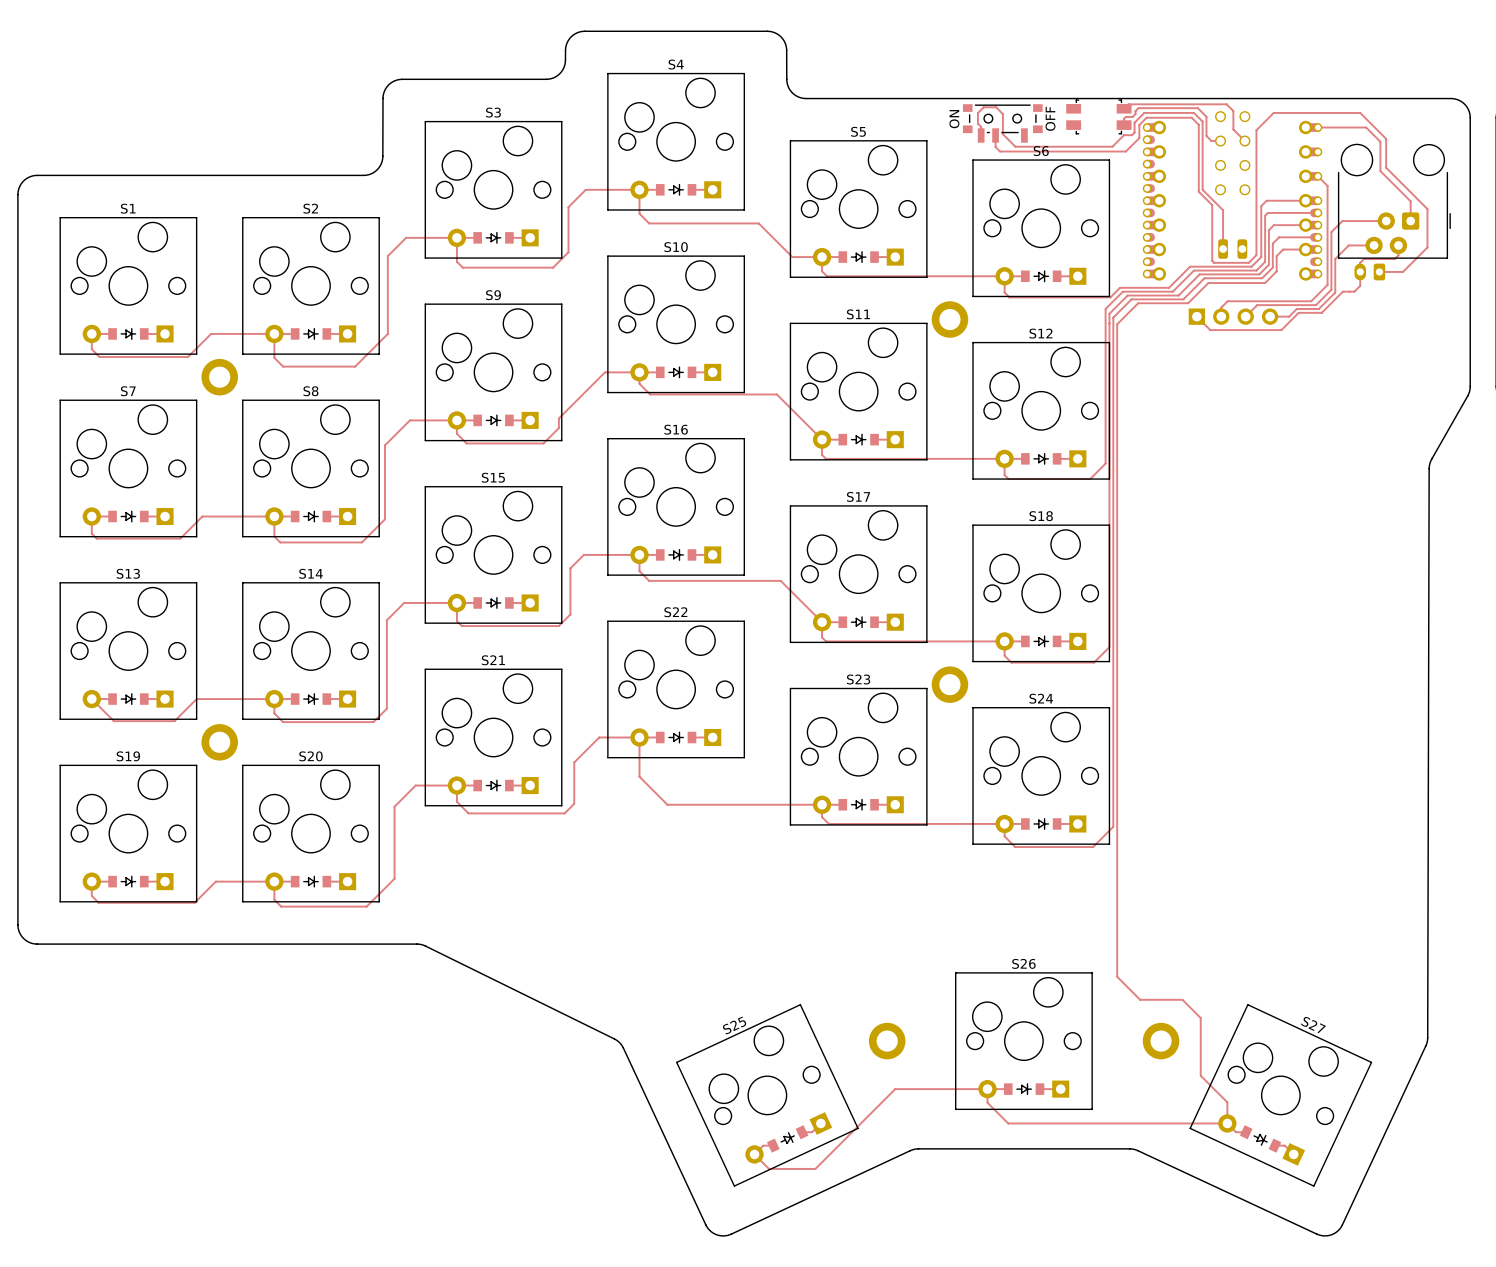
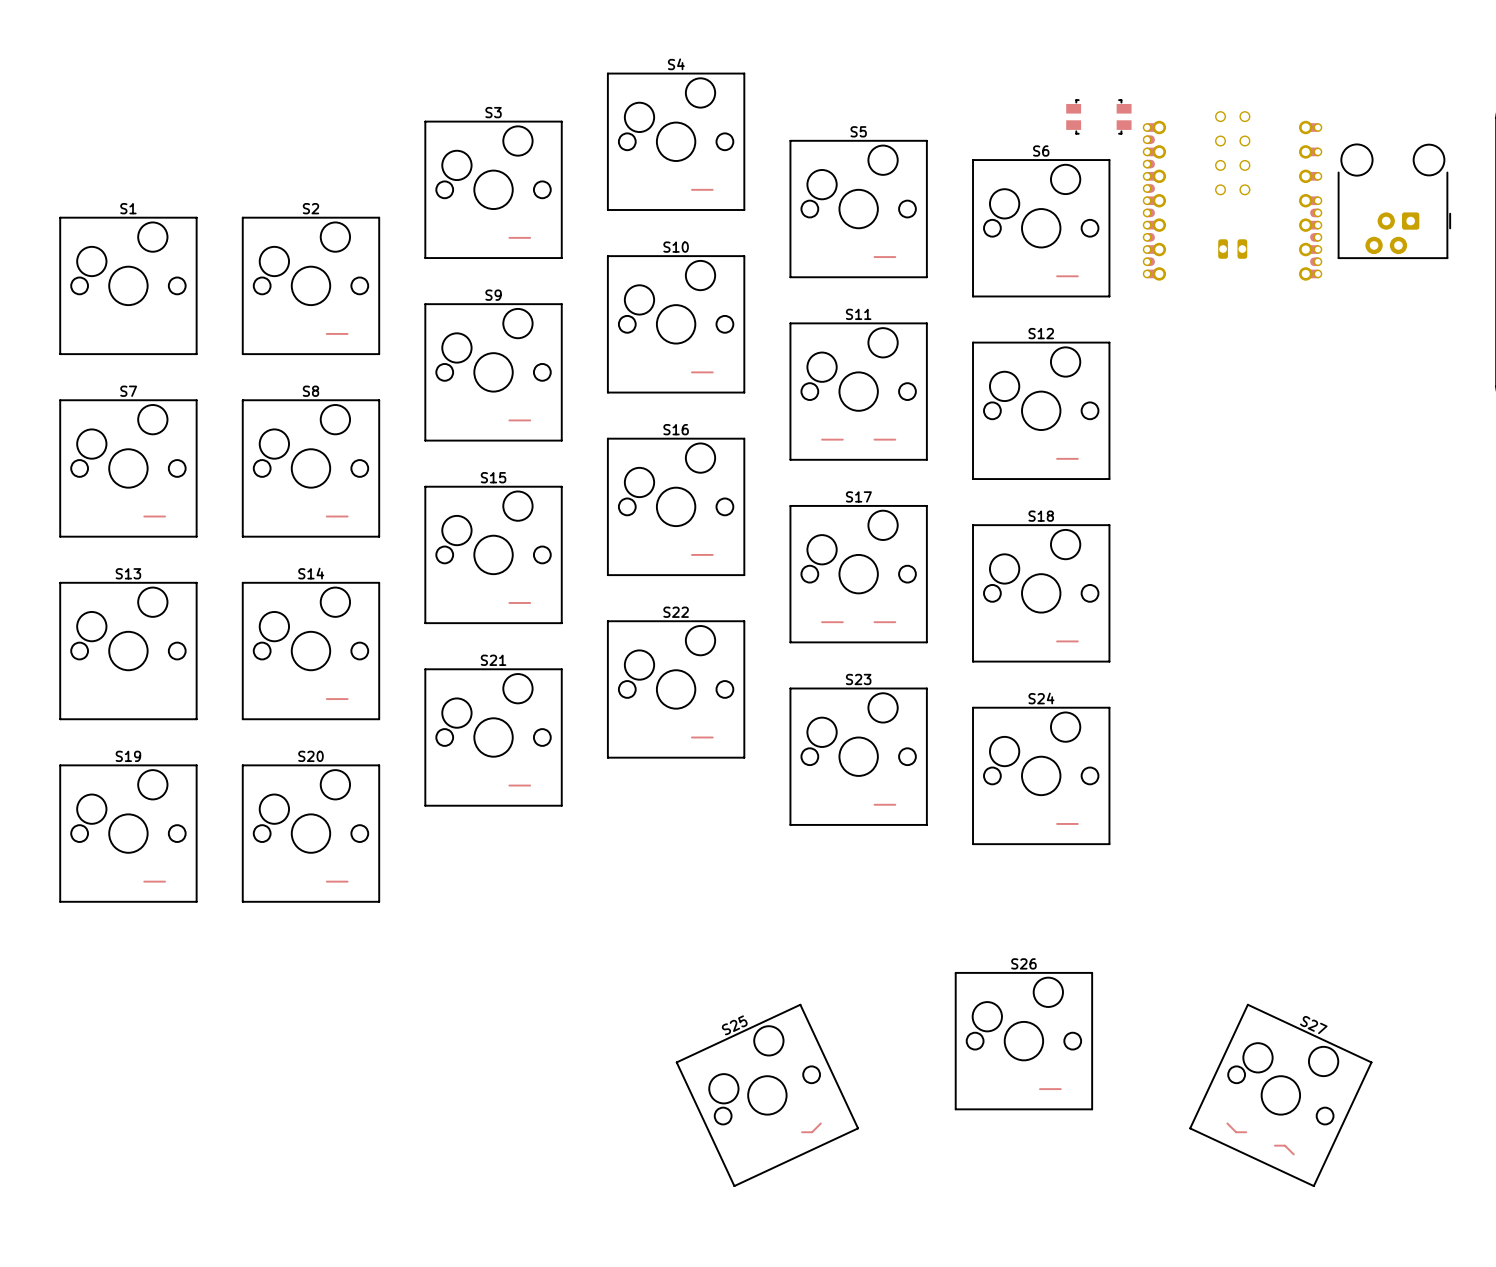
board edge: (584, 31) (772, 31) (781, 36) (786, 45) (788, 86) (794, 94) (803, 98) (1451, 98) (1459, 100) (1467, 107) (1470, 117) (1470, 388) (1431, 459) (1429, 468) (1427, 1039) (1342, 1224) (1336, 1232) (1326, 1235) (1316, 1234) (1133, 1149) (918, 1148) (910, 1150) (731, 1234) (718, 1235) (711, 1231) (705, 1224) (619, 1042) (425, 946) (417, 944) (37, 944) (26, 941) (20, 935) (17, 924) (17, 194) (20, 184) (28, 177) (37, 175) (368, 174) (377, 169) (382, 161) (383, 95) (386, 86) (392, 81) (402, 79) (551, 78) (559, 73) (563, 67) (565, 47) (569, 38) (575, 33) (584, 31) -> none
track: (1124, 108) (1128, 104) (1226, 104) (1233, 111) (1233, 129) (1244, 141) -> none
part: (1002, 123) -> none
track: (1124, 125) (1124, 118) (1132, 116) (1138, 108) (1197, 108) (1206, 116) (1206, 136) (1211, 141) (1220, 141) -> none
track: (1305, 127) (1366, 127) (1380, 141) (1380, 171) (1410, 201) (1410, 221) -> none
track: (981, 135) (981, 126) (977, 123) (977, 113) (983, 107) (996, 107) (1002, 114) (1002, 134) (1015, 146) (1112, 146) (1123, 135) (1132, 135) (1134, 132) (1134, 122) (1144, 112) (1194, 112) (1202, 121) (1202, 189) (1223, 210) (1223, 249) -> none
track: (995, 135) (995, 147) (1000, 151) (1125, 151) (1139, 138) (1139, 125) (1146, 117) (1191, 117) (1198, 124) (1198, 191) (1212, 205) (1212, 260) (1214, 262) (1248, 262) (1256, 255) (1256, 130) (1273, 112) (1360, 112) (1386, 138) (1386, 167) (1427, 209) (1427, 247) (1402, 271) (1379, 271) -> none
track: (1305, 176) (1317, 176) (1327, 185) (1327, 284) (1311, 301) (1227, 301) (1221, 307) (1221, 316) -> none
track: (639, 189) (639, 213) (649, 223) (758, 223) (792, 257) (842, 257) -> none
track: (660, 189) (585, 189) (568, 207) (568, 252) (553, 267) (462, 267) (456, 261) (456, 237) -> none
part: (675, 189) -> none
track: (1317, 200) (1266, 200) (1261, 206) (1261, 257) (1251, 266) (1190, 266) (1169, 287) (1120, 287) (1110, 297) (1009, 297) (1004, 292) (1004, 276) -> none
track: (1317, 212) (1267, 212) (1265, 215) (1265, 261) (1256, 270) (1193, 270) (1172, 291) (1122, 291) (1105, 308) (1105, 463) (1090, 479) (1008, 479) (1004, 475) (1004, 458) -> none
track: (1386, 221) (1342, 221) (1331, 232) (1331, 289) (1316, 305) (1257, 305) (1245, 316) -> none
track: (1317, 225) (1274, 225) (1268, 230) (1268, 264) (1259, 274) (1199, 274) (1178, 295) (1127, 295) (1109, 313) (1109, 647) (1094, 662) (1011, 662) (1004, 655) (1004, 641) -> none
track: (477, 237) (406, 237) (387, 256) (387, 333) (355, 366) (283, 366) (274, 357) (274, 333) -> none
part: (493, 237) -> none
track: (1317, 237) (1279, 237) (1272, 243) (1272, 267) (1262, 278) (1204, 278) (1183, 299) (1131, 299) (1113, 317) -> none
track: (1374, 245) (1348, 245) (1335, 258) (1335, 292) (1318, 308) (1296, 308) (1289, 316) (1270, 316) -> none
track: (1398, 245) (1398, 255) (1394, 259) (1364, 259) (1360, 262) (1360, 285) (1354, 291) (1342, 291) (1321, 312) (1298, 312) (1281, 330) (1210, 330) (1196, 316) -> none
track: (1317, 249) (1283, 249) (1276, 256) (1276, 271) (1265, 283) (1208, 283) (1188, 303) (1138, 303) (1117, 324) (1117, 976) (1140, 999) (1182, 999) (1200, 1018) (1200, 1075) (1227, 1102) (1227, 1123) (1008, 1123) (987, 1102) (987, 1089) -> none
track: (822, 257) (822, 271) (826, 276) (1025, 276) -> none
part: (858, 257) -> none
part: (1369, 271) -> none
part: (1040, 276) -> none
part: (1233, 316) -> none
track: (1113, 317) (1113, 826) (1093, 847) (1015, 847) (1004, 836) (1004, 823) -> none
part: (949, 319) -> none
track: (112, 333) (91, 333) (91, 349) (99, 357) (187, 357) (211, 333) (295, 333) -> none
part: (128, 333) -> none
track: (144, 333) (165, 333) -> none
part: (310, 333) -> none
track: (639, 372) (639, 383) (650, 394) (776, 394) (822, 439) (822, 454) (825, 458) (1025, 458) -> none
track: (660, 372) (605, 372) (558, 418) (558, 428) (543, 443) (466, 443) (456, 433) (456, 420) -> none
part: (675, 372) -> none
part: (219, 377) -> none
track: (477, 420) (409, 420) (384, 445) (384, 519) (361, 542) (280, 542) (274, 536) (274, 516) -> none
part: (493, 420) -> none
part: (858, 439) -> none
part: (1040, 458) -> none
track: (112, 516) (91, 516) (91, 533) (96, 538) (180, 538) (202, 516) (295, 516) -> none
part: (128, 516) -> none
part: (310, 516) -> none
track: (639, 554) (639, 571) (649, 580) (780, 580) (822, 622) (822, 637) (825, 641) (1025, 641) -> none
track: (660, 554) (583, 554) (570, 568) (570, 614) (558, 626) (461, 626) (456, 621) (456, 602) -> none
part: (675, 554) -> none
track: (477, 602) (404, 602) (386, 620) (386, 708) (373, 722) (283, 722) (274, 713) (274, 699) -> none
part: (493, 602) -> none
part: (858, 622) -> none
part: (1040, 641) -> none
part: (949, 684) -> none
track: (112, 699) (91, 699) (113, 721) (174, 721) (196, 699) (295, 699) -> none
part: (128, 699) -> none
track: (144, 699) (165, 699) -> none
part: (310, 699) -> none
track: (639, 737) (639, 776) (667, 804) (842, 804) -> none
track: (660, 737) (599, 737) (574, 762) (574, 803) (564, 813) (468, 813) (456, 801) (456, 785) -> none
part: (675, 737) -> none
part: (219, 742) -> none
track: (477, 785) (415, 785) (394, 806) (394, 878) (366, 906) (281, 906) (274, 899) (274, 881) -> none
part: (493, 785) -> none
track: (822, 804) (822, 817) (828, 823) (1025, 823) -> none
part: (858, 804) -> none
part: (1040, 823) -> none
track: (112, 881) (91, 881) (91, 895) (98, 902) (194, 902) (215, 881) (295, 881) -> none
part: (128, 881) -> none
part: (310, 881) -> none
part: (887, 1041) -> none
part: (1161, 1041) -> none
track: (1008, 1089) (895, 1089) (815, 1168) (769, 1168) (754, 1154) (763, 1145) (773, 1145) -> none
part: (1023, 1089) -> none
part: (788, 1137) -> none
part: (1261, 1140) -> none

